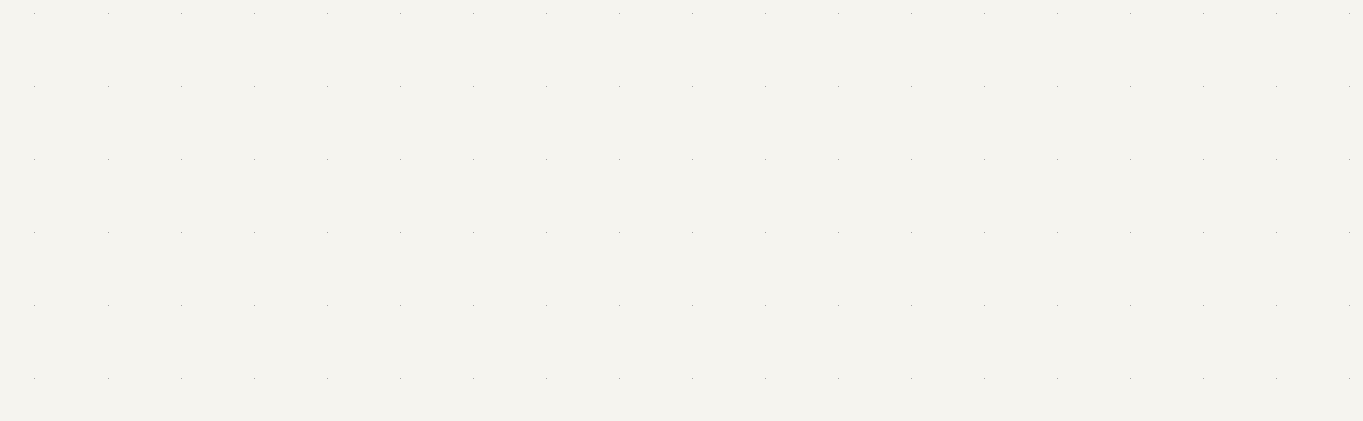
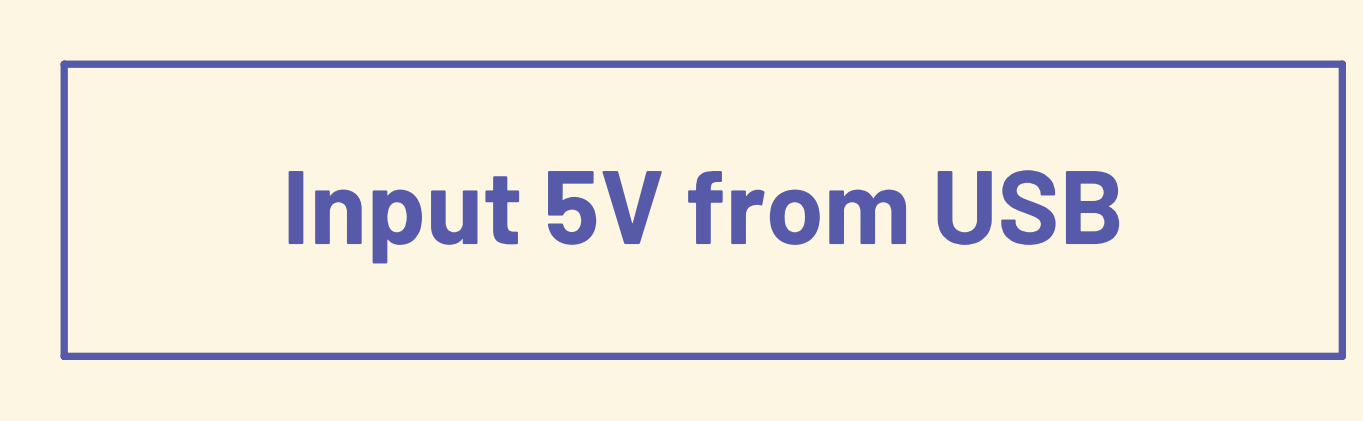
line: none -> (64, 64) (1342, 64) (1342, 356) (64, 356) (64, 64)
text: none -> Input 5V from USB (703, 216)

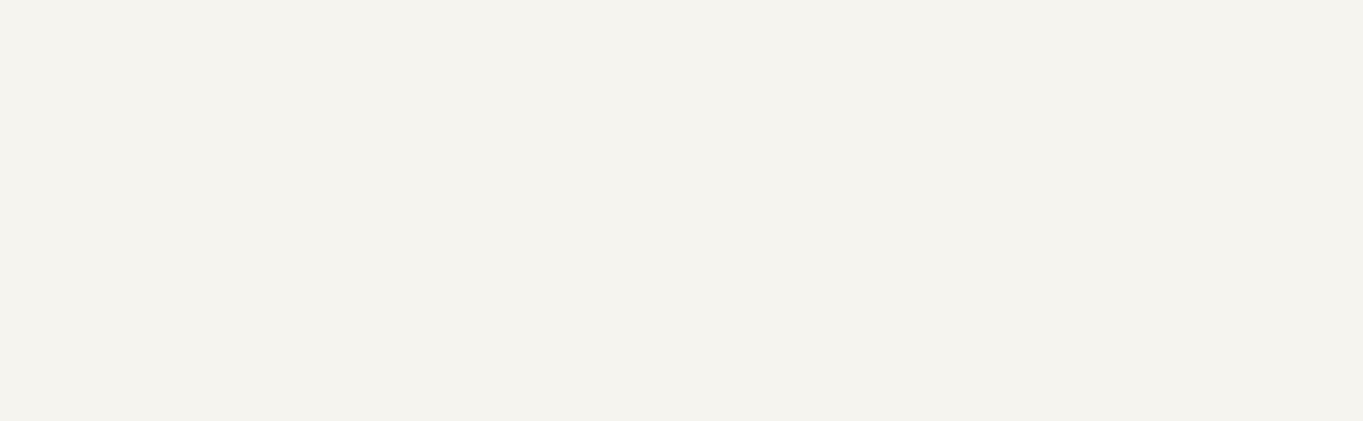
line: (64, 64) (1342, 64) (1342, 356) (64, 356) (64, 64) -> none
text: Input 5V from USB (703, 216) -> none

